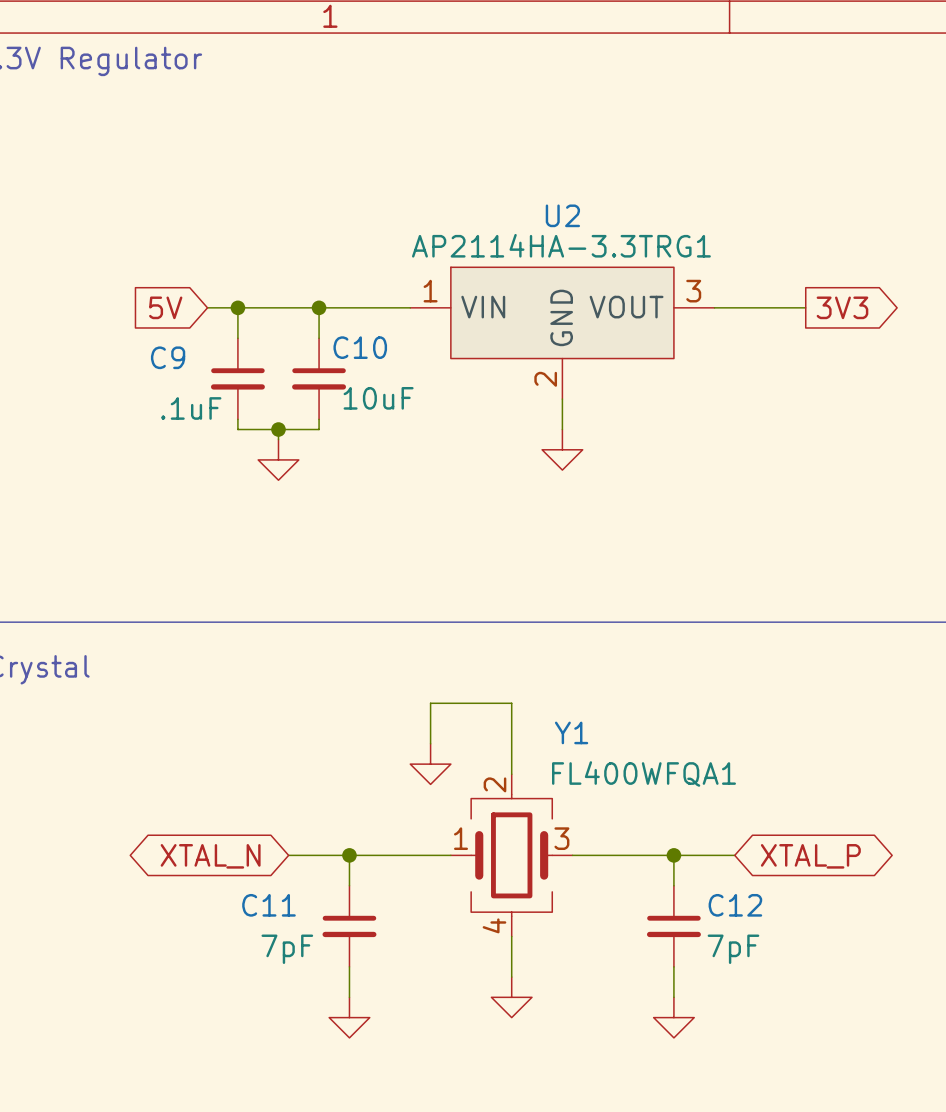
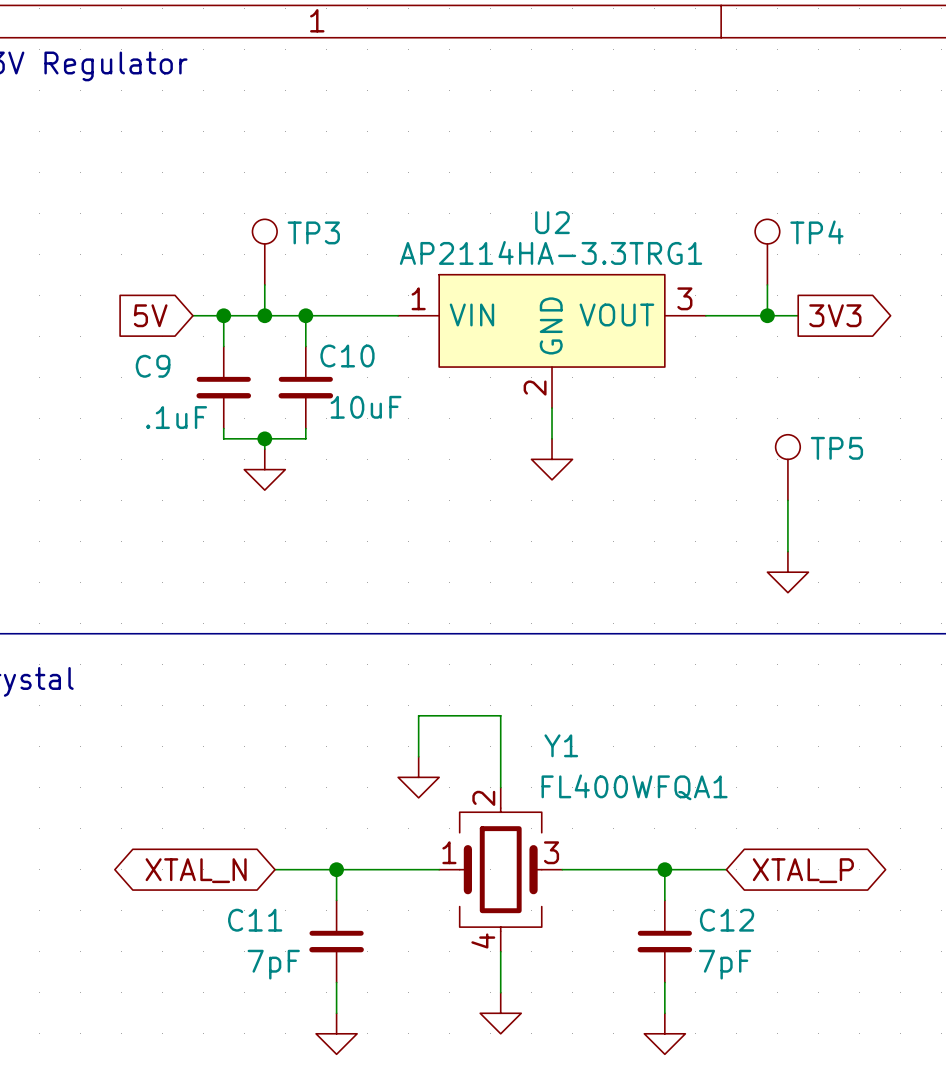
TP3: none -> (264, 252)
TP4: none -> (767, 252)
wire: none -> (264, 284) (264, 315)
wire: none -> (767, 284) (767, 315)
junction: none -> (264, 315)
junction: none -> (767, 315)
TP5: none -> (787, 467)
wire: none -> (787, 500) (787, 551)
power symbol: none -> (787, 572)

